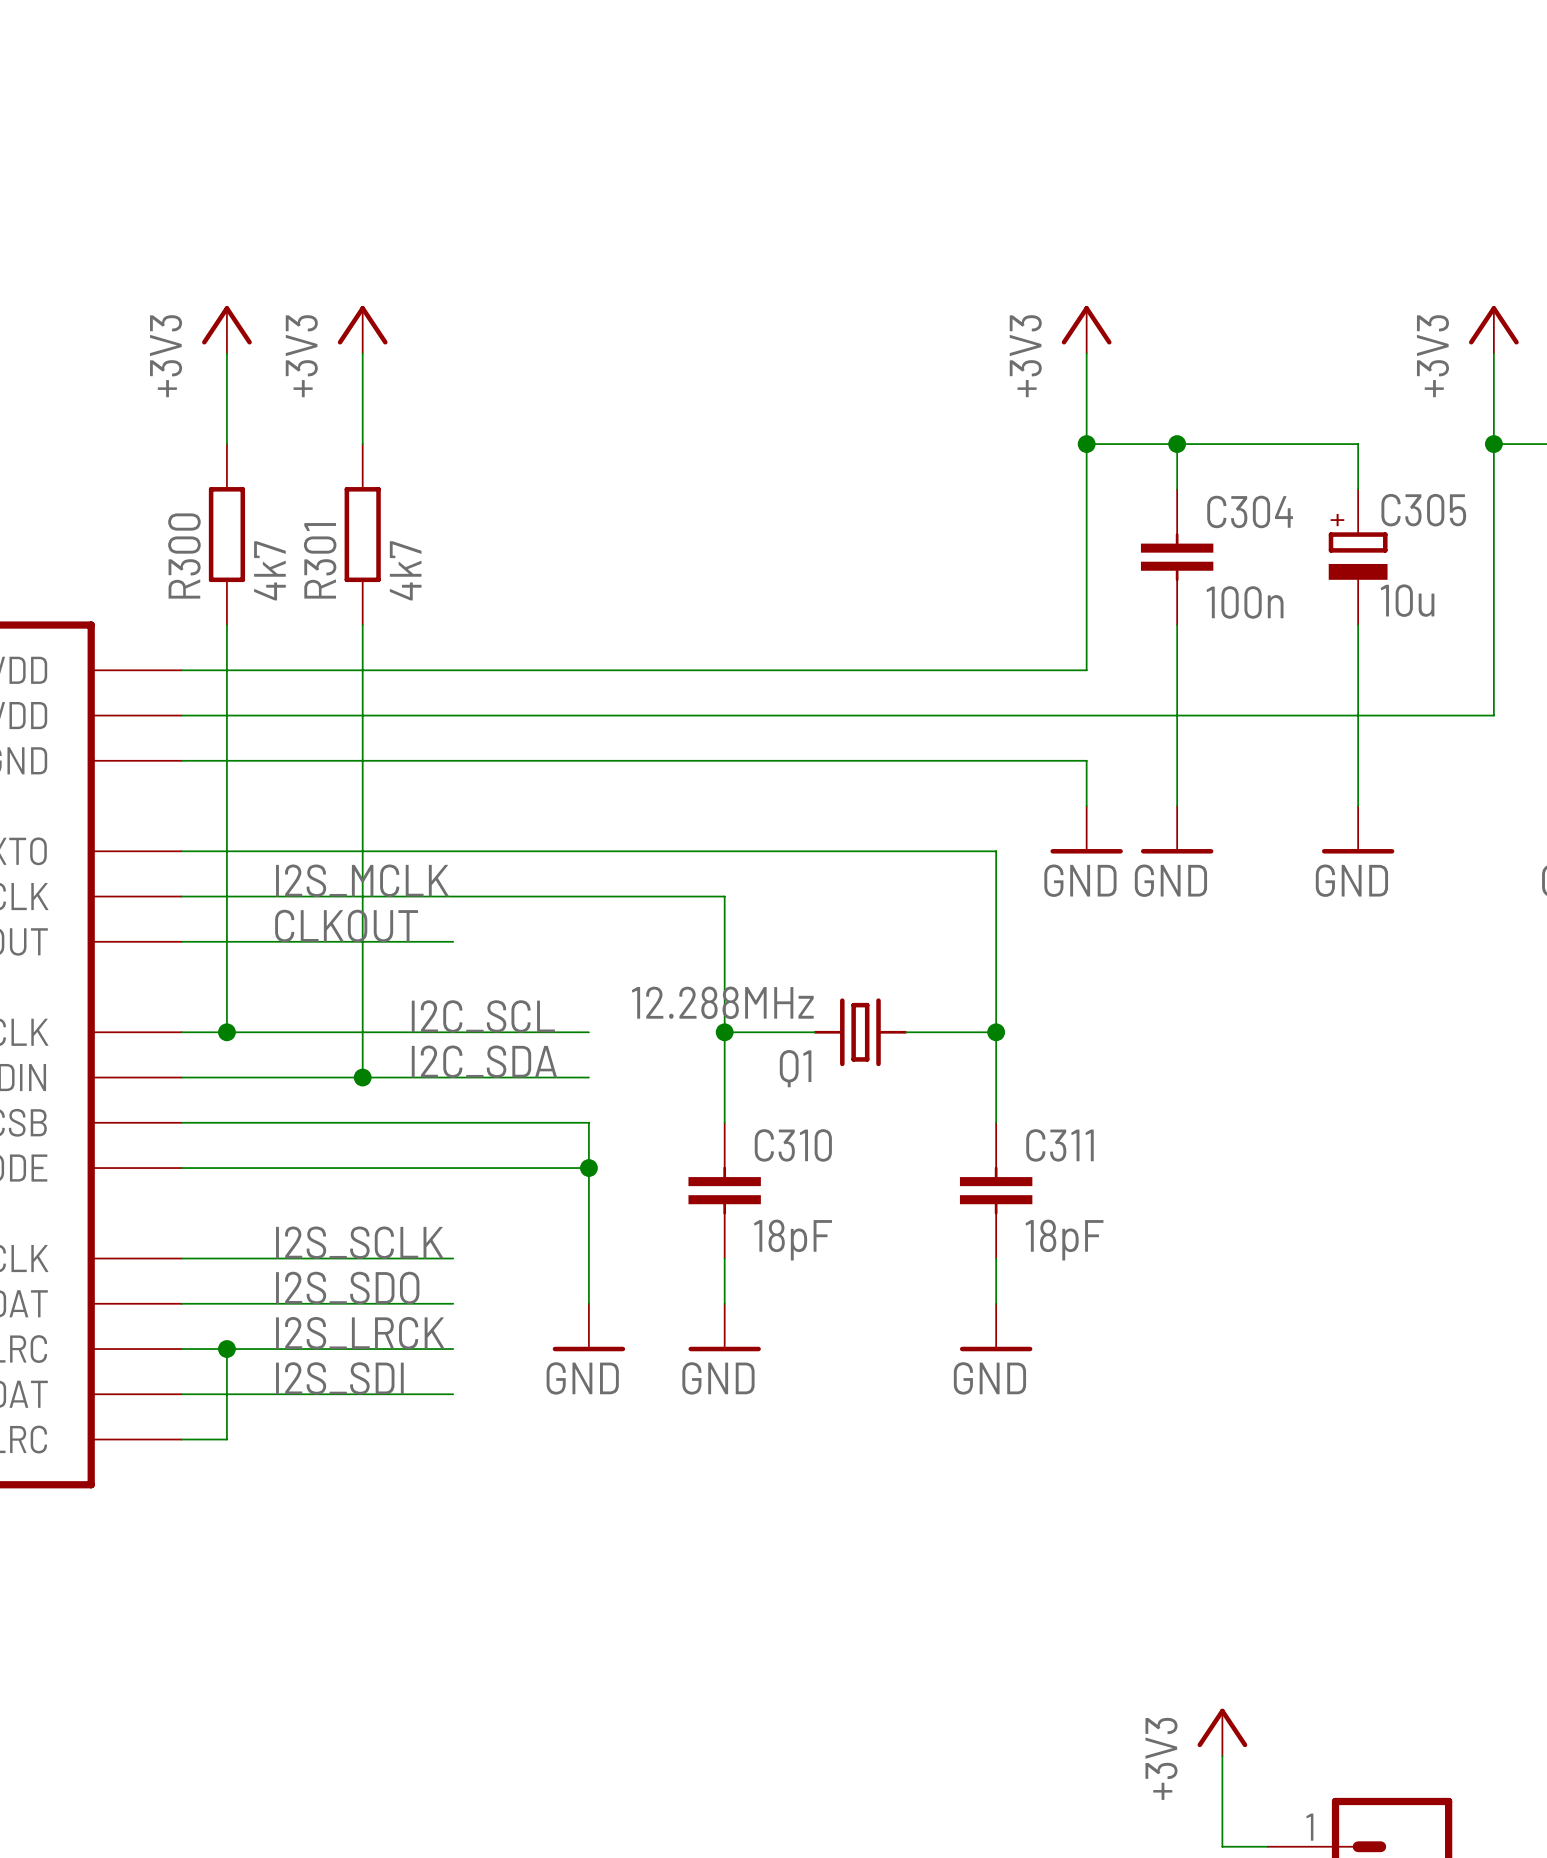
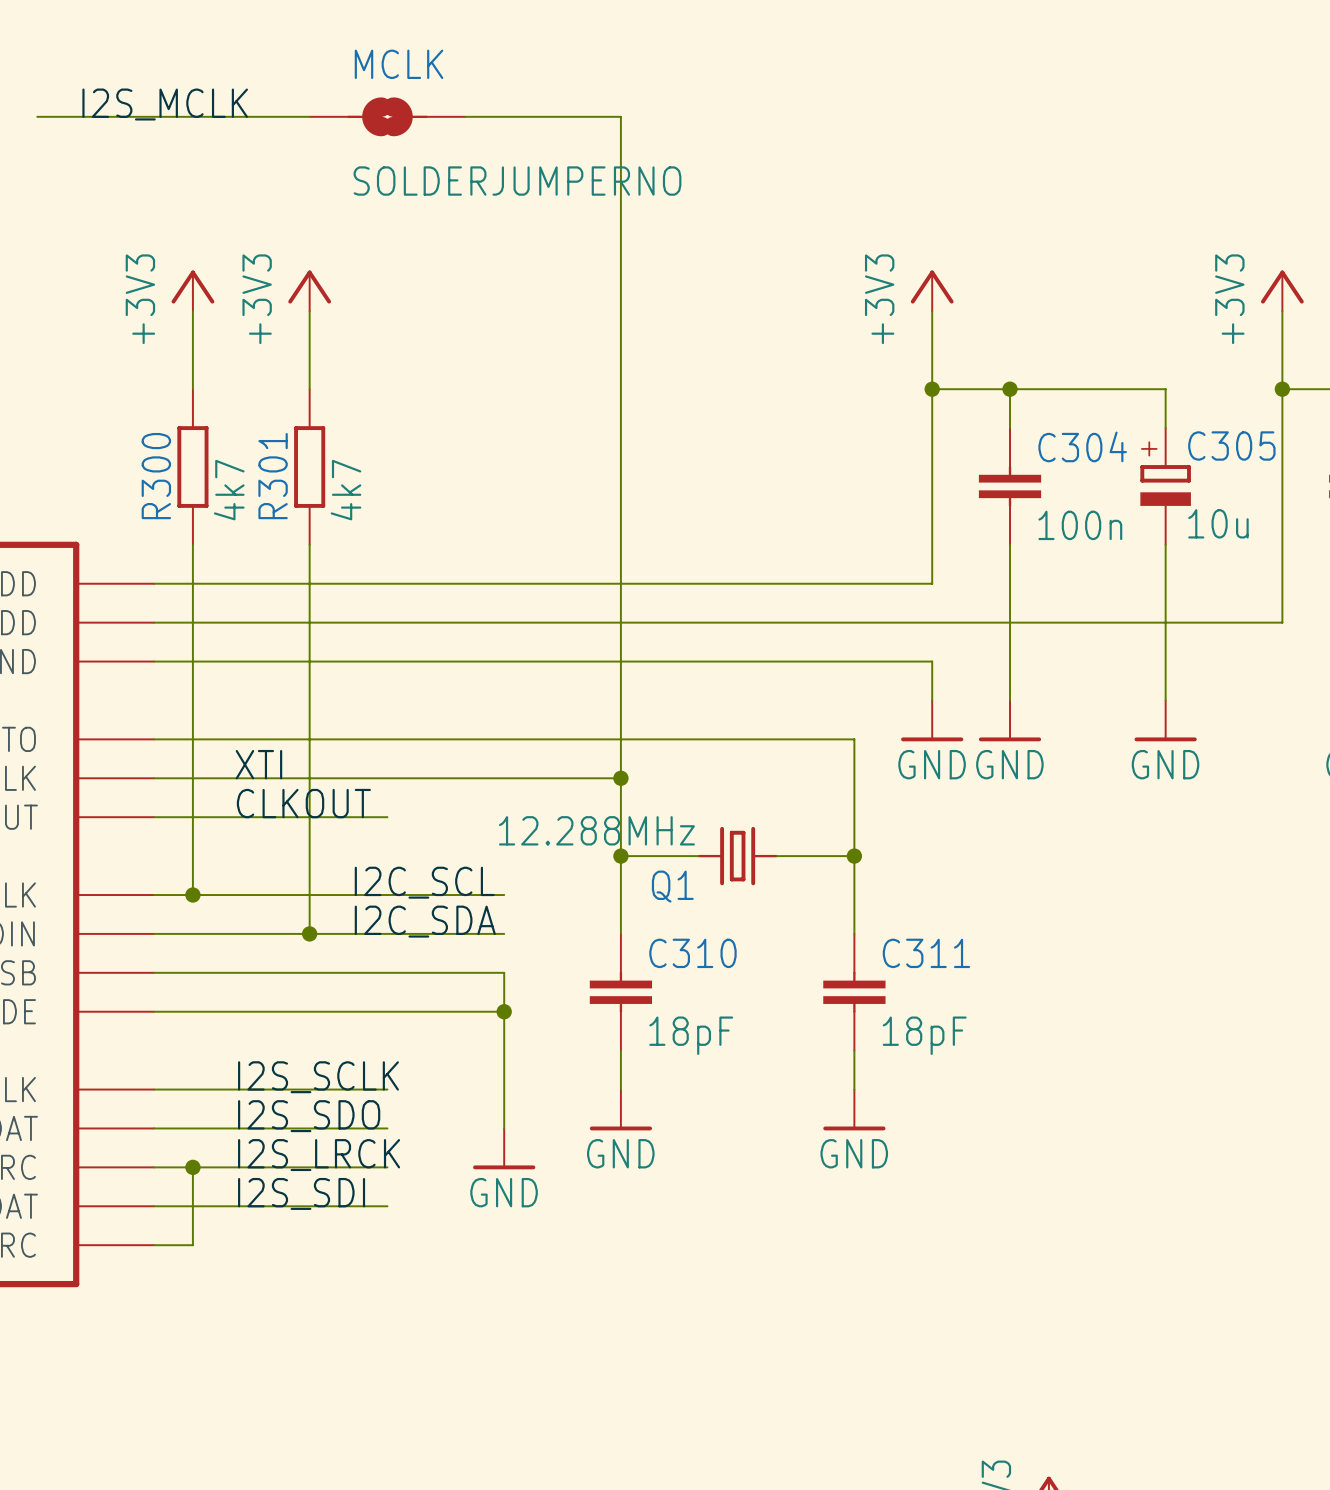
label: none -> I2S_MCLK (165, 104)
wire: none -> (37, 116) (309, 116)
MCLK: none -> SOLDERJUMPERNO (387, 116)
wire: none -> (465, 116) (620, 116) (620, 778)
label: I2S_MCLK (362, 880) -> XTI (258, 764)
junction: none -> (620, 778)
wire: (724, 1032) (815, 1032) -> (620, 856) (698, 856)
junction position: (724, 1032) -> (620, 856)
Q1 position: (860, 1032) -> (737, 856)
wire: (905, 1032) (996, 1032) -> (776, 856) (854, 856)
junction position: (996, 1032) -> (854, 856)
C310 position: (724, 1190) -> (620, 992)
C311 position: (996, 1190) -> (854, 992)
power symbol position: GND (724, 1327) -> GND (620, 1109)
power symbol position: GND (996, 1327) -> GND (854, 1109)

